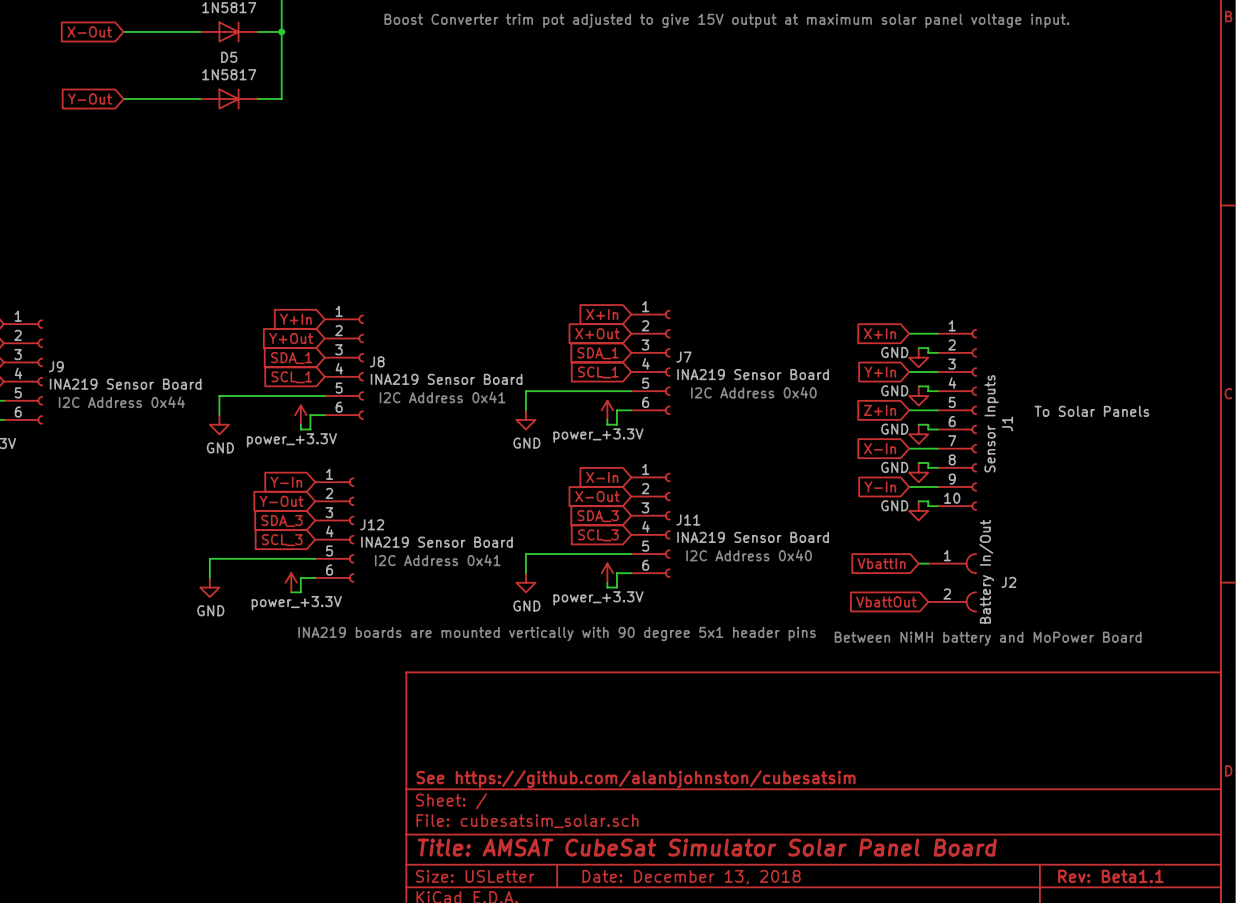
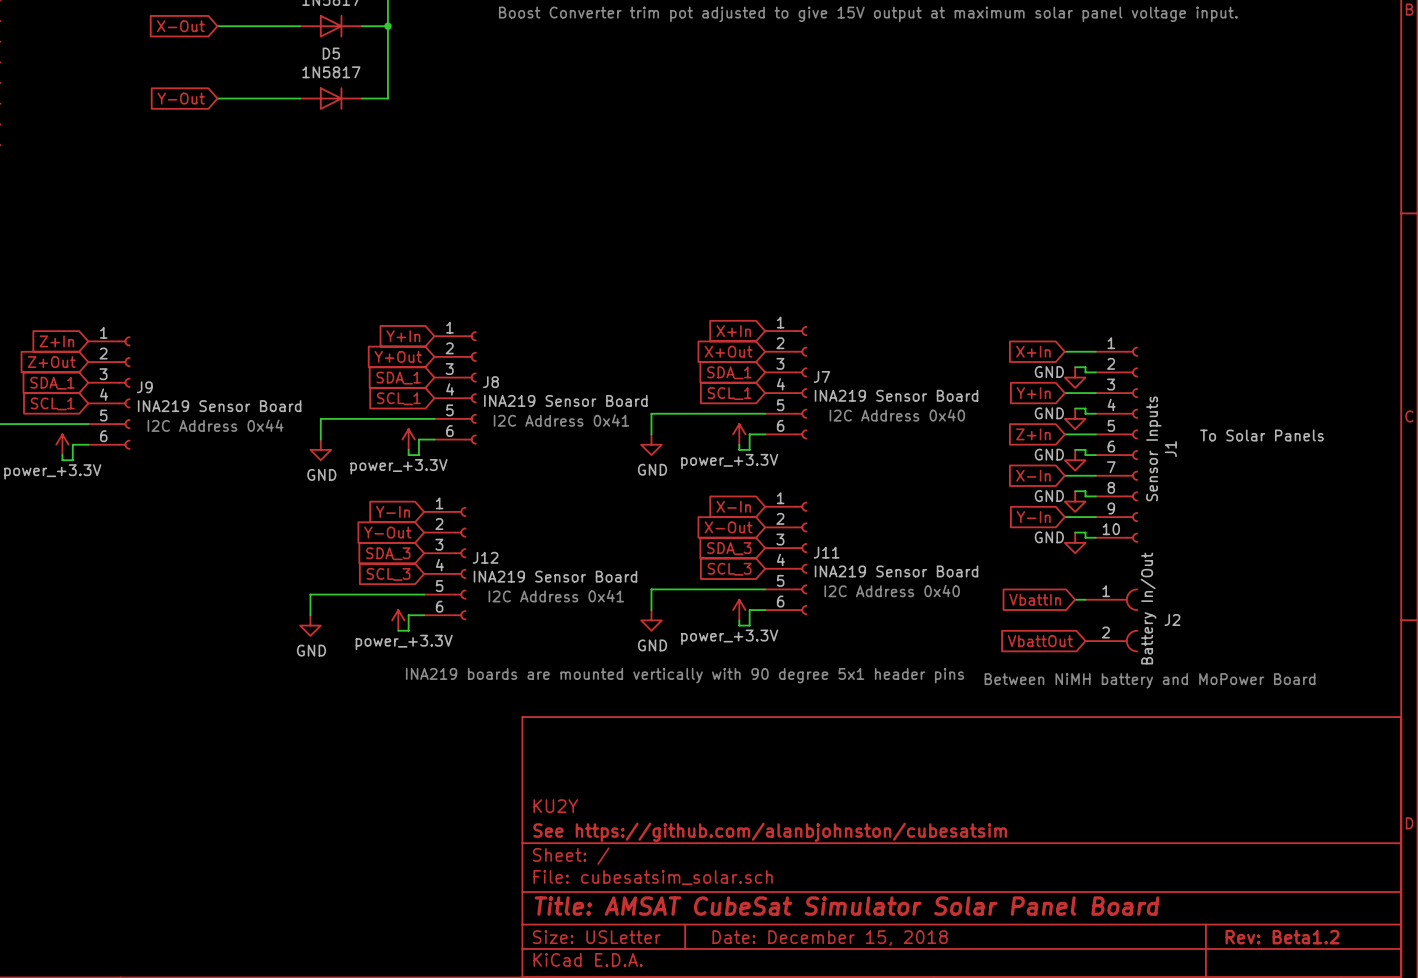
title block: none -> KU2Y (555, 806)
title block: Rev: Beta1.1 (1110, 876) -> Rev: Beta1.2 (1282, 937)
title block: Date: December 13, 2018 (691, 877) -> Date: December 15, 2018 (830, 938)

